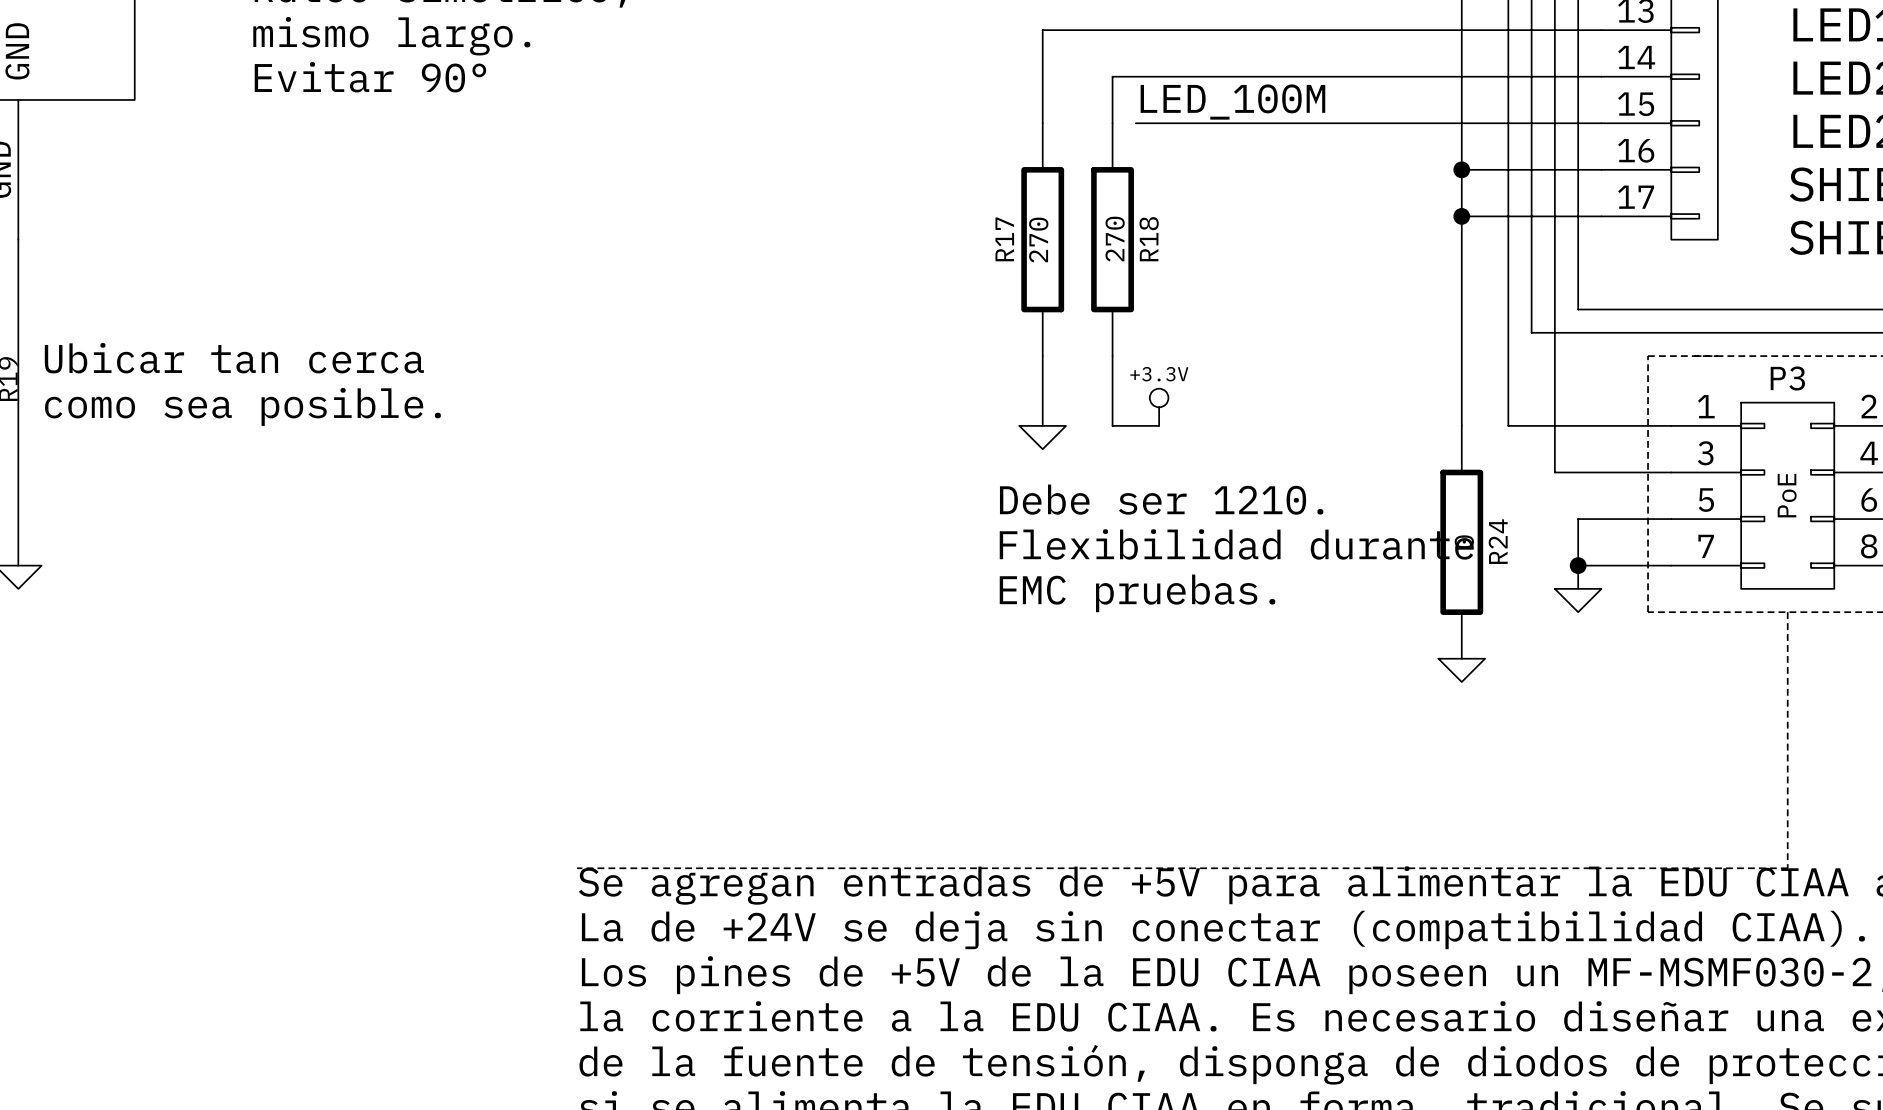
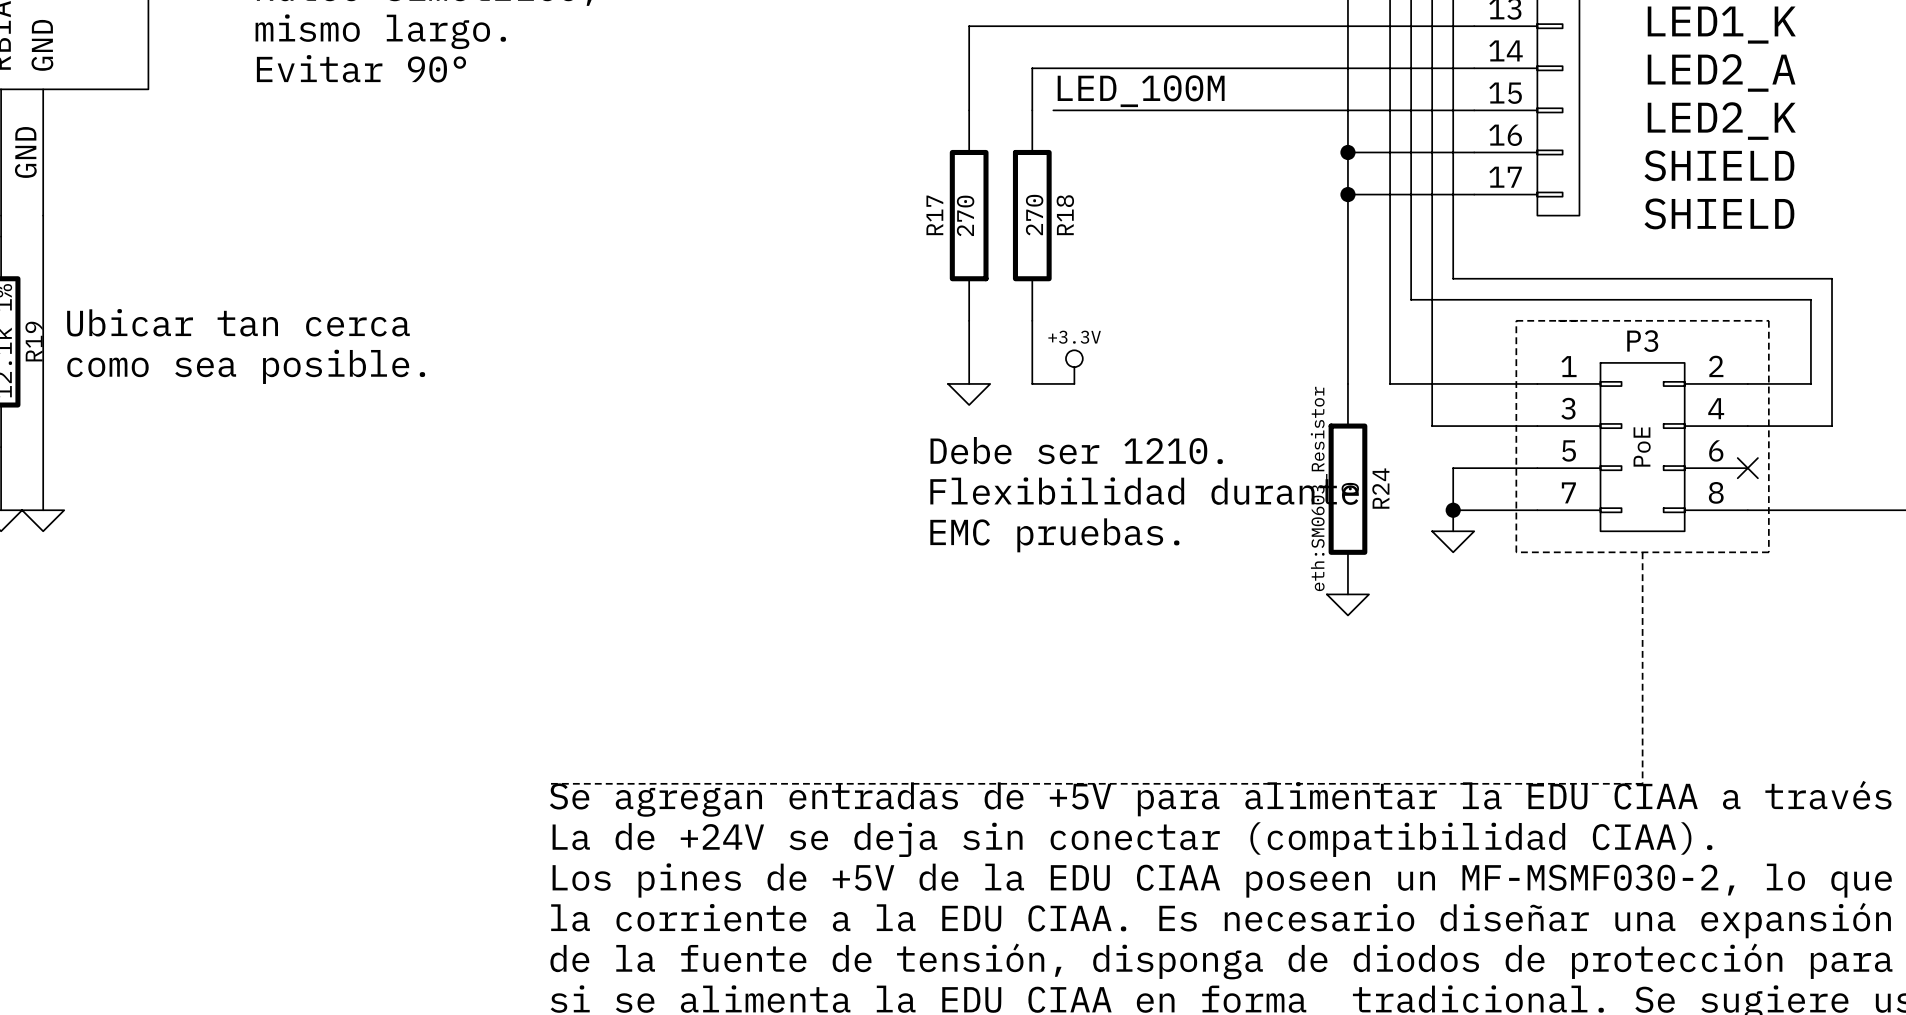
R24 text: none -> eth:SM0603_Resistor (1319, 488)

